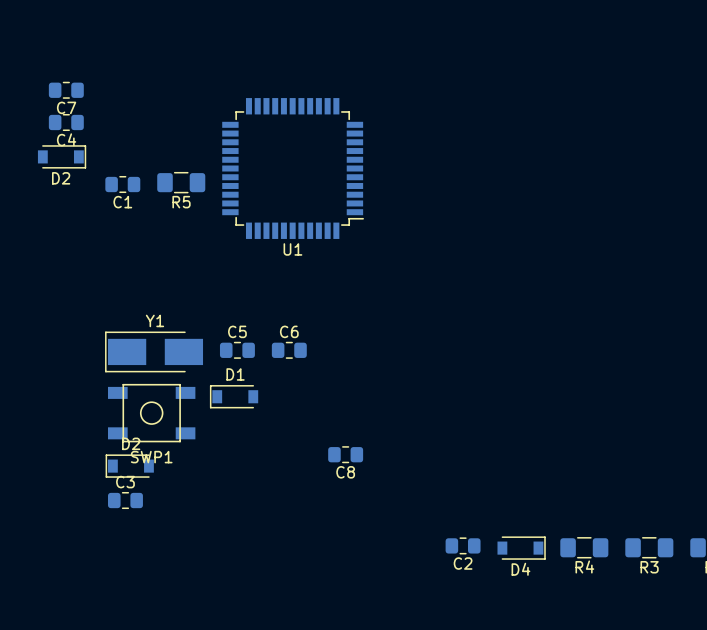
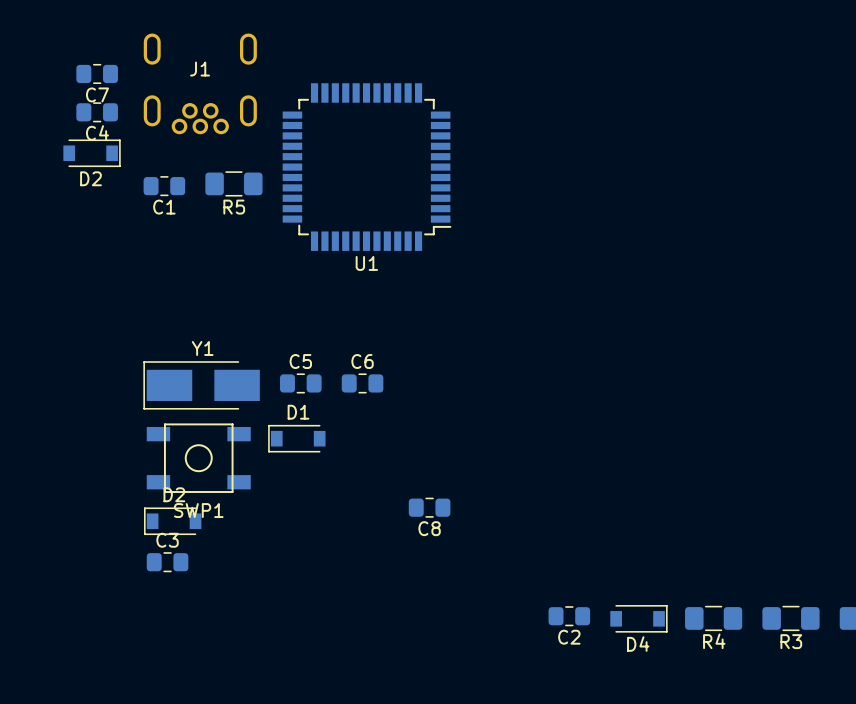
J1: none -> (200, 83)

